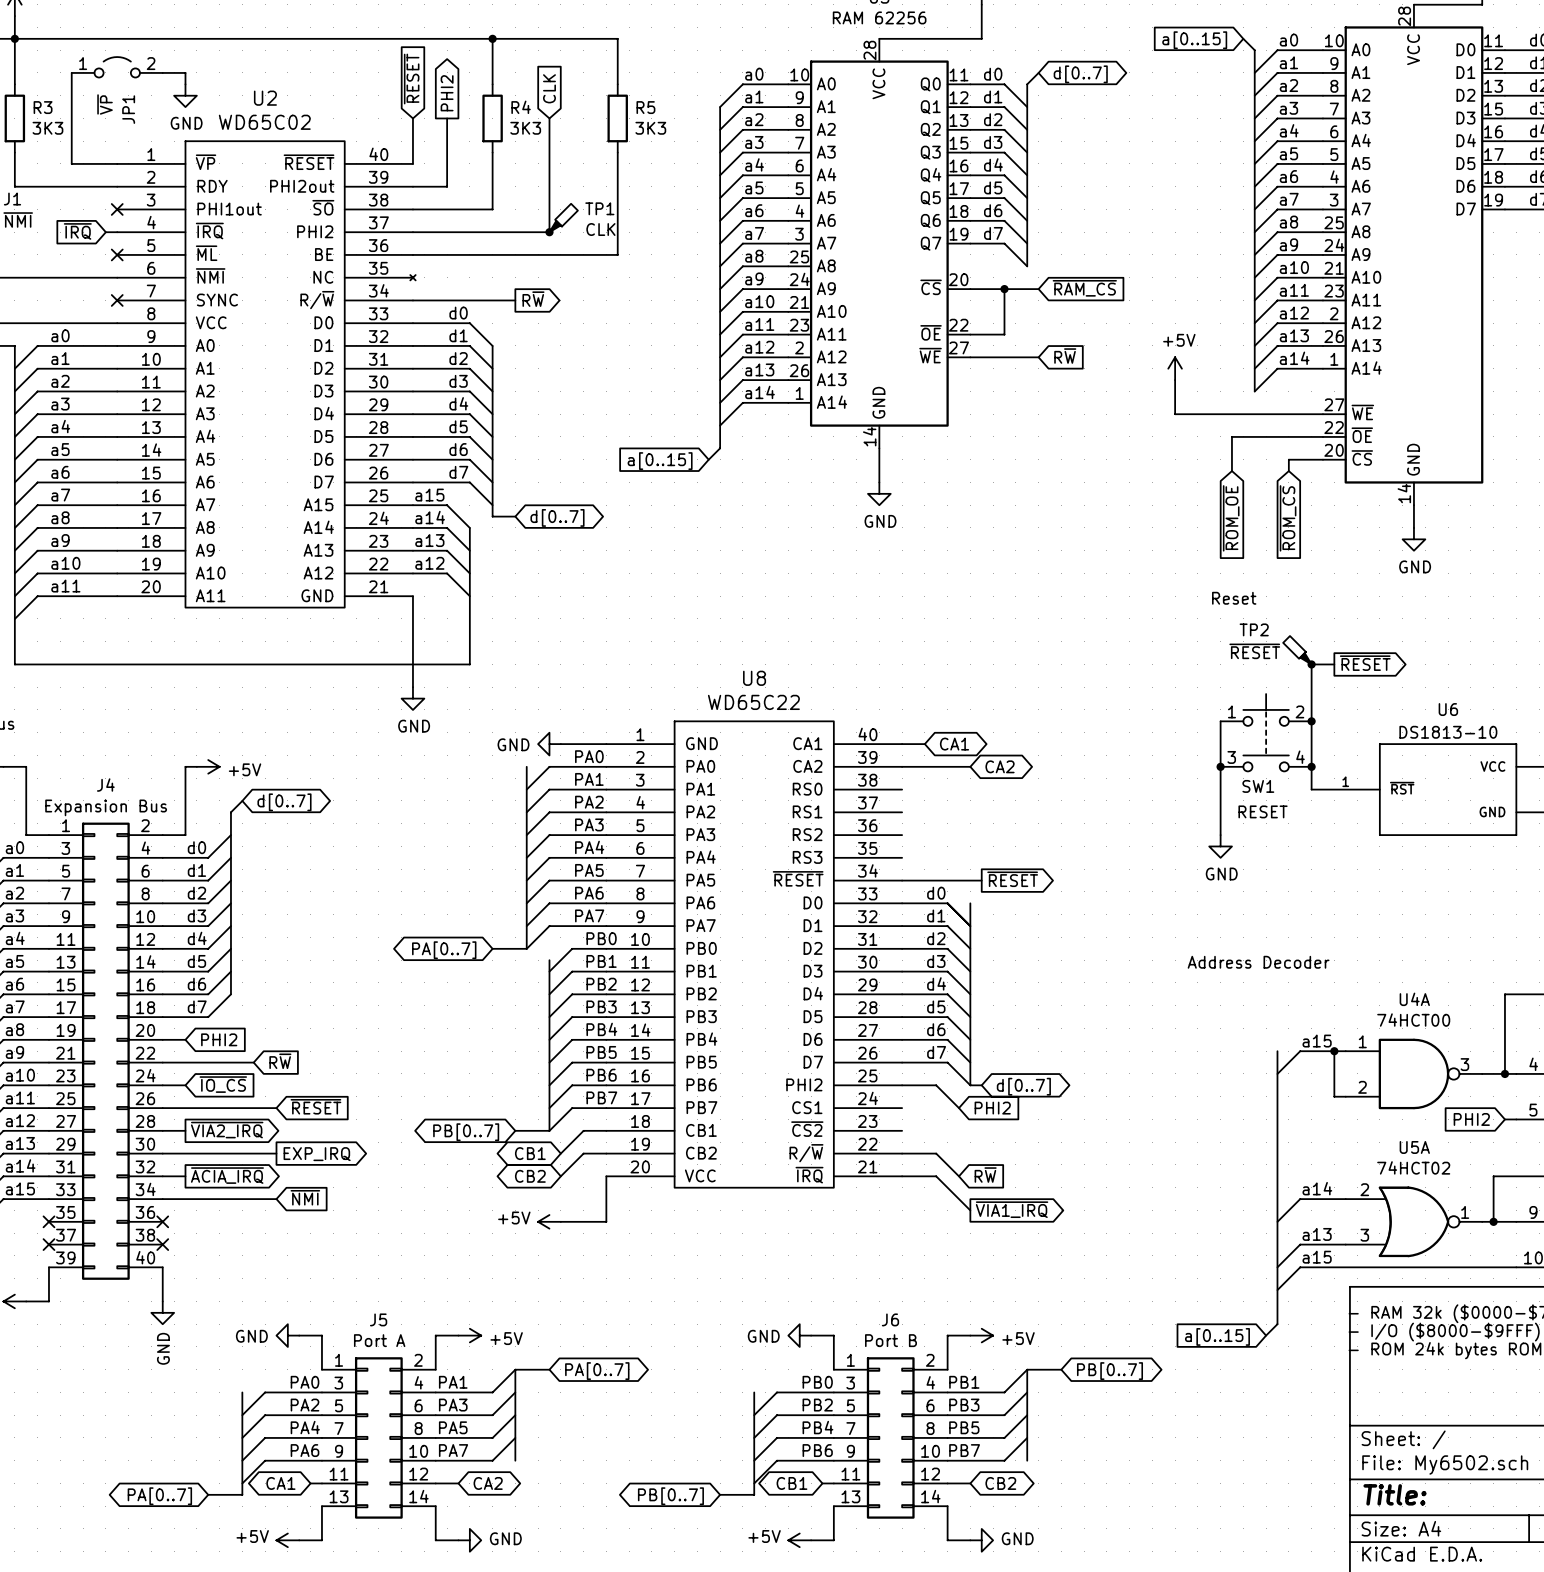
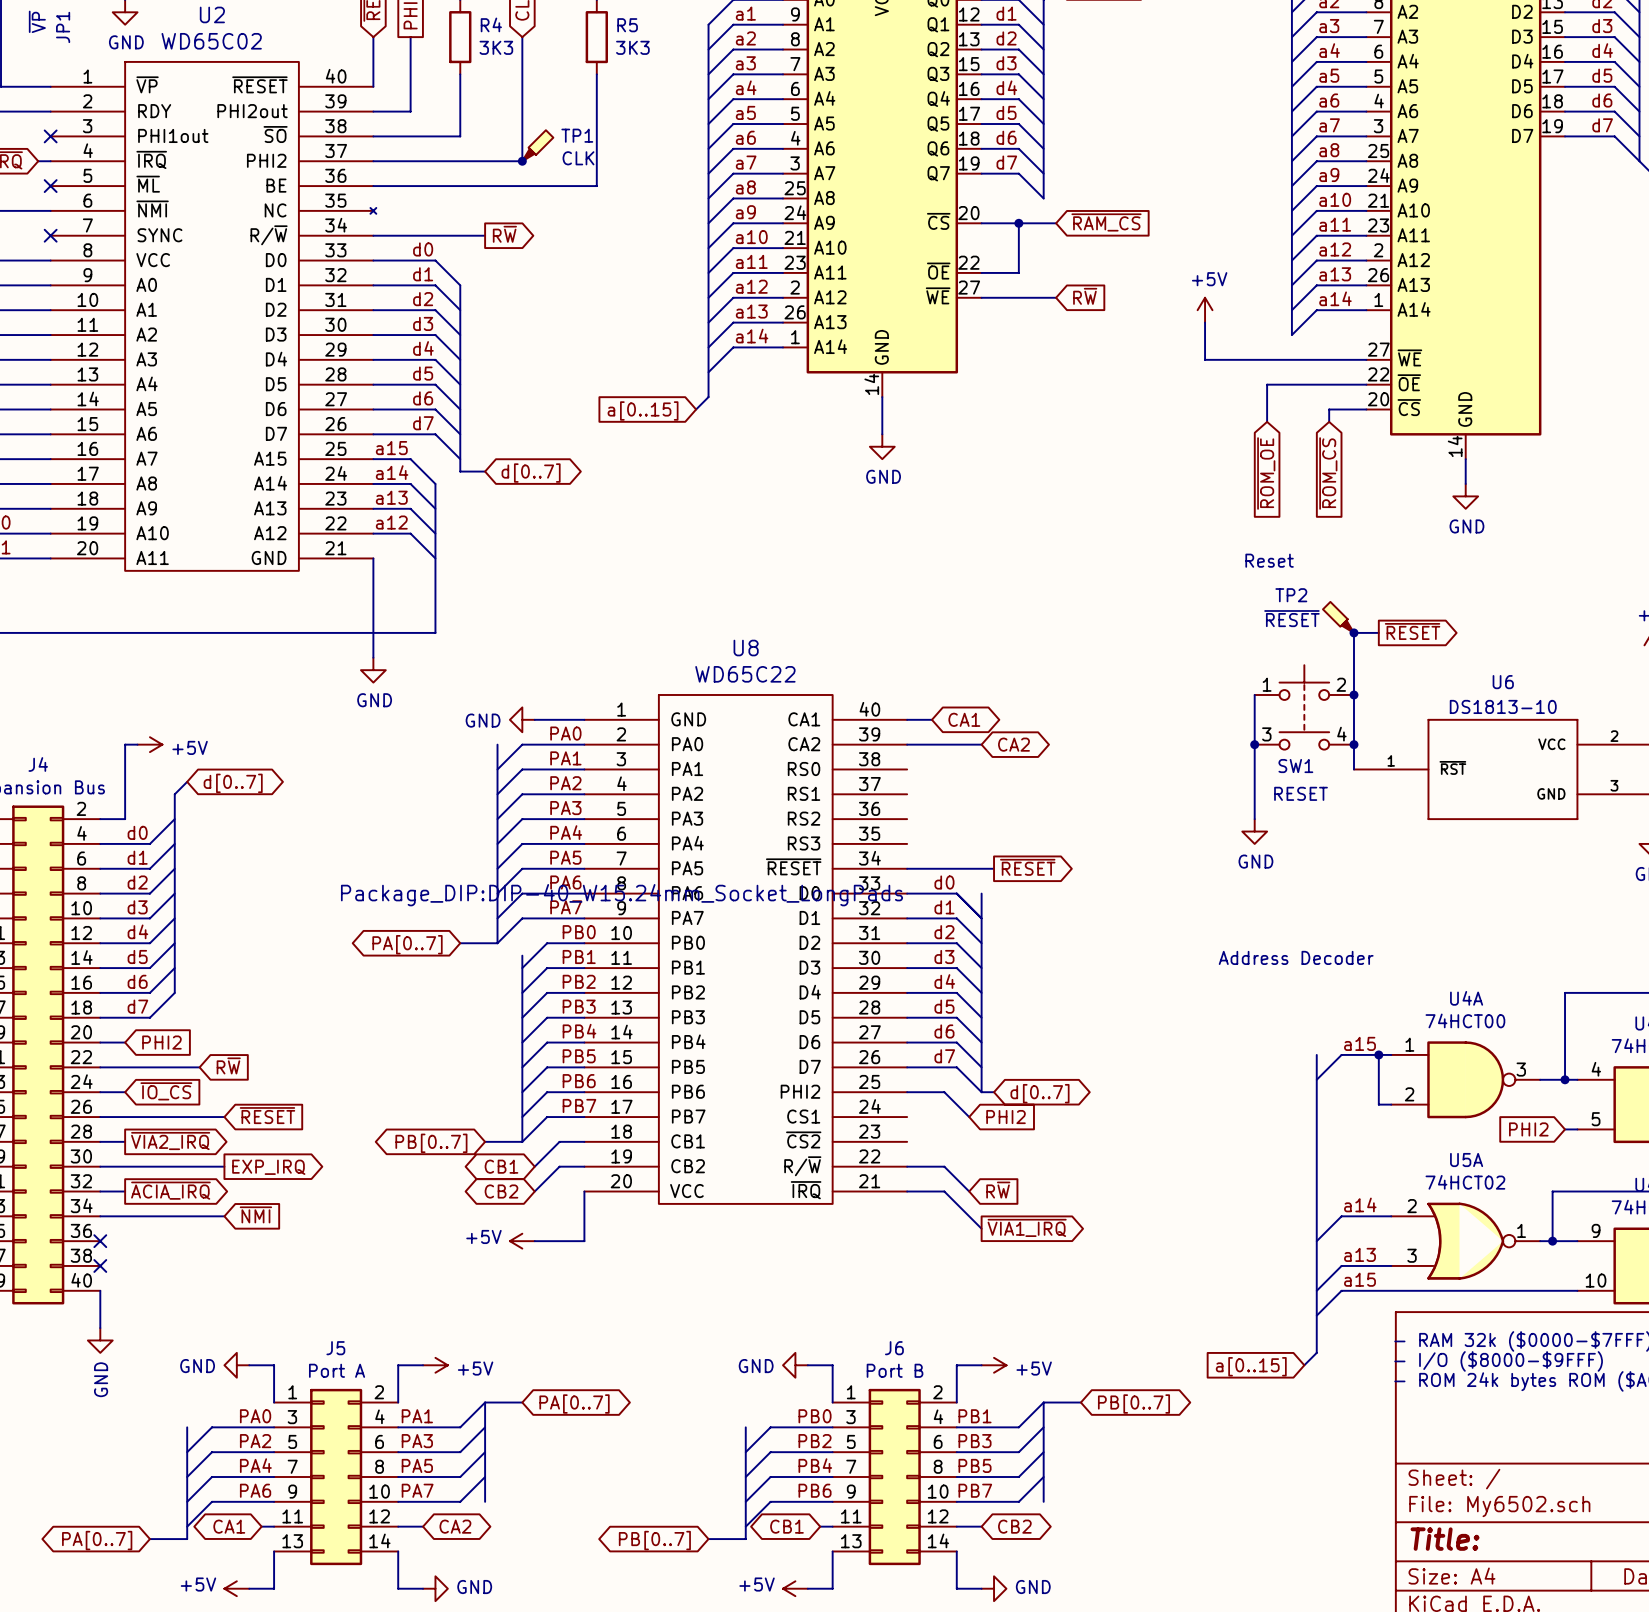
U8 text: none -> Package_DIP:DIP-40_W15.24mm_Socket_LongPads (621, 895)

